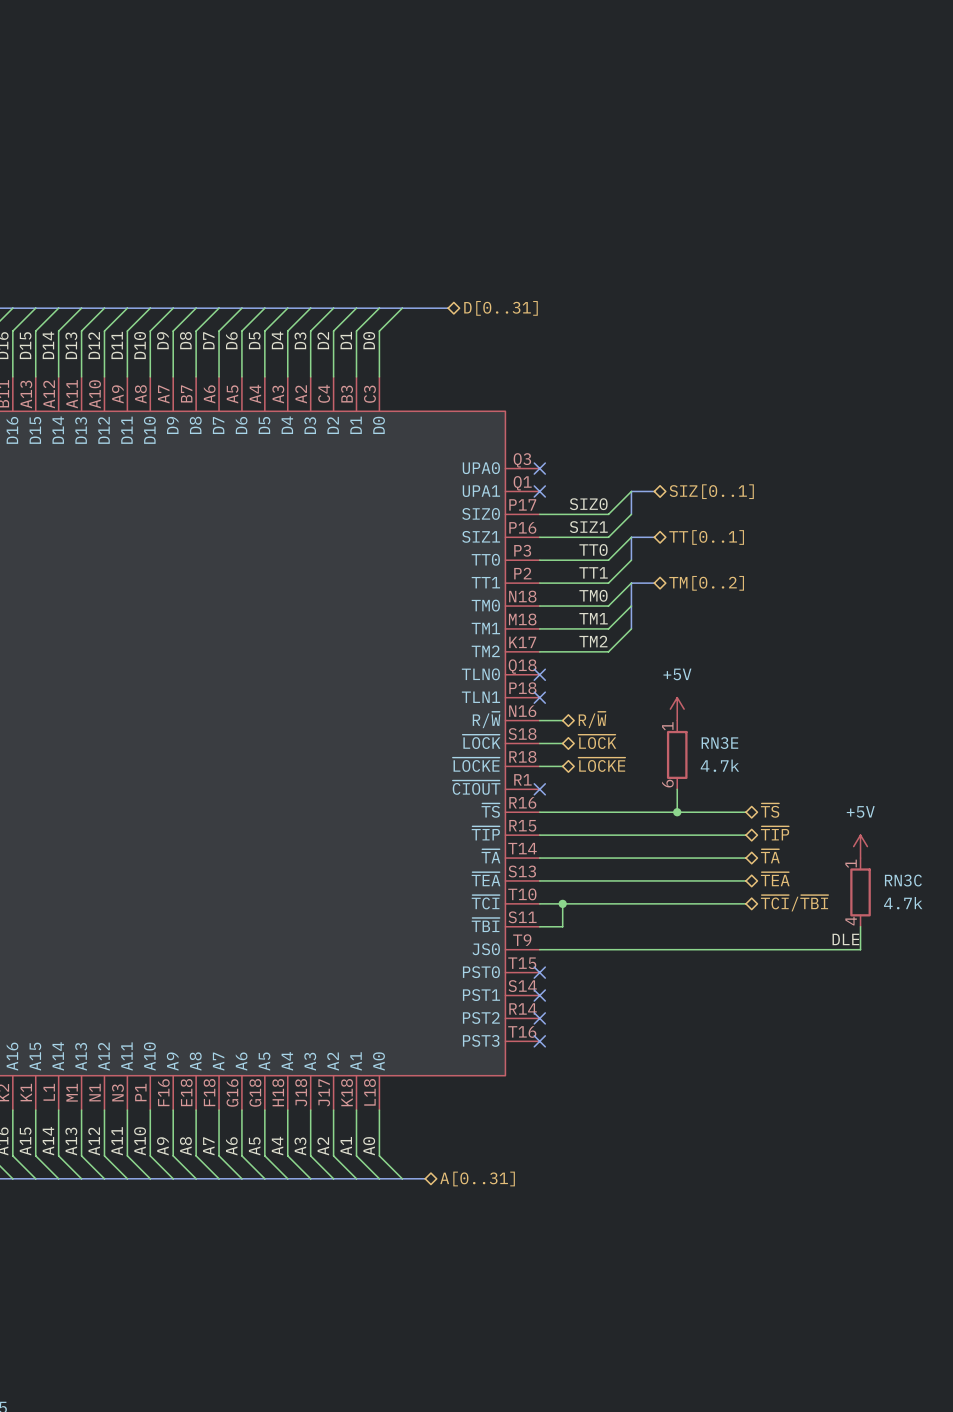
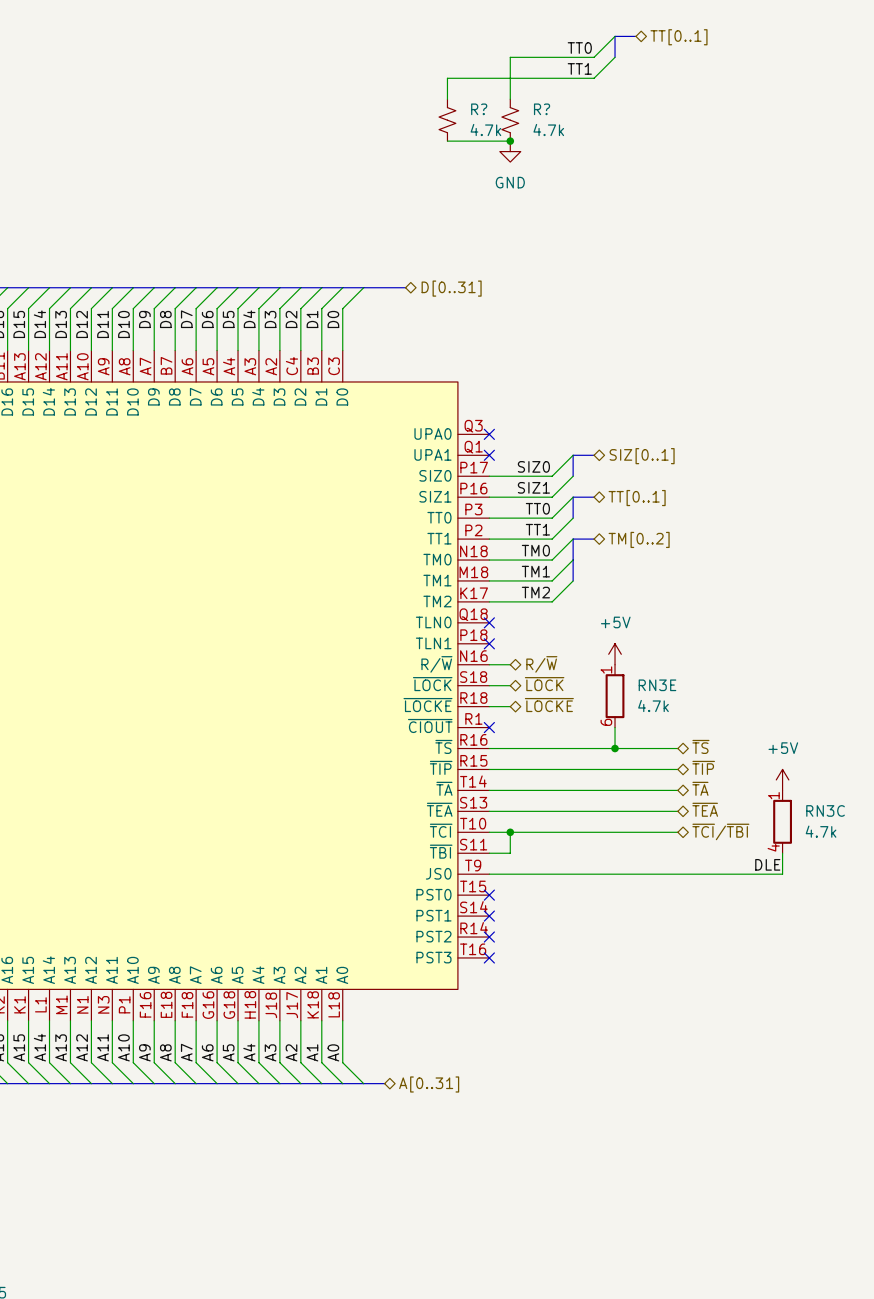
wire: none -> (615, 36) (594, 57) (510, 57) (510, 99)
bus: none -> (635, 36) (615, 36) (615, 57)
hierarchical label: none -> TT[0..1] (679, 37)
label: none -> TT0 (579, 48)
wire: none -> (615, 57) (594, 78) (447, 78) (447, 99)
label: none -> TT1 (579, 68)
R?: none -> 4.7k (447, 120)
R?: none -> 4.7k (510, 120)
wire: none -> (447, 141) (510, 141)
junction: none -> (510, 141)
power symbol: none -> GND (510, 151)

